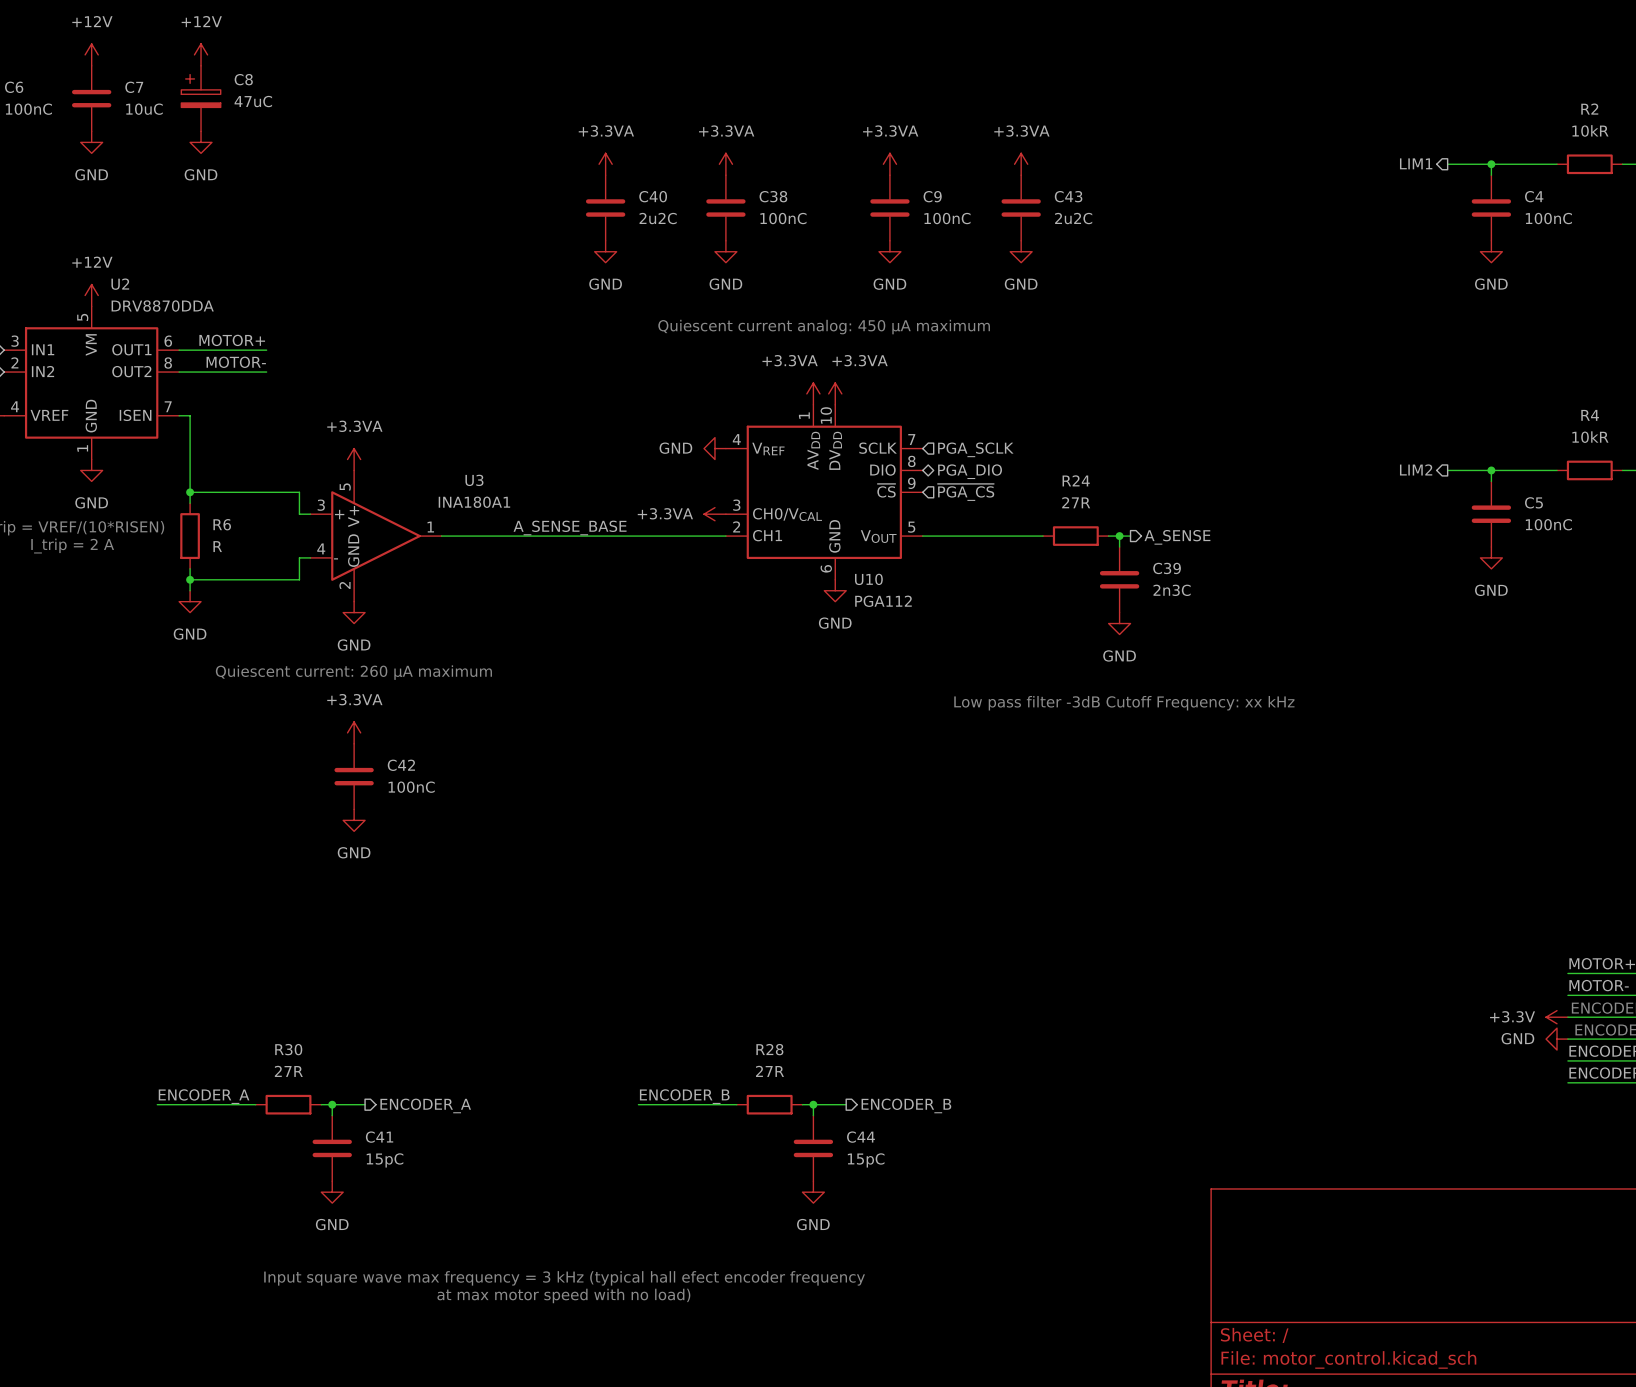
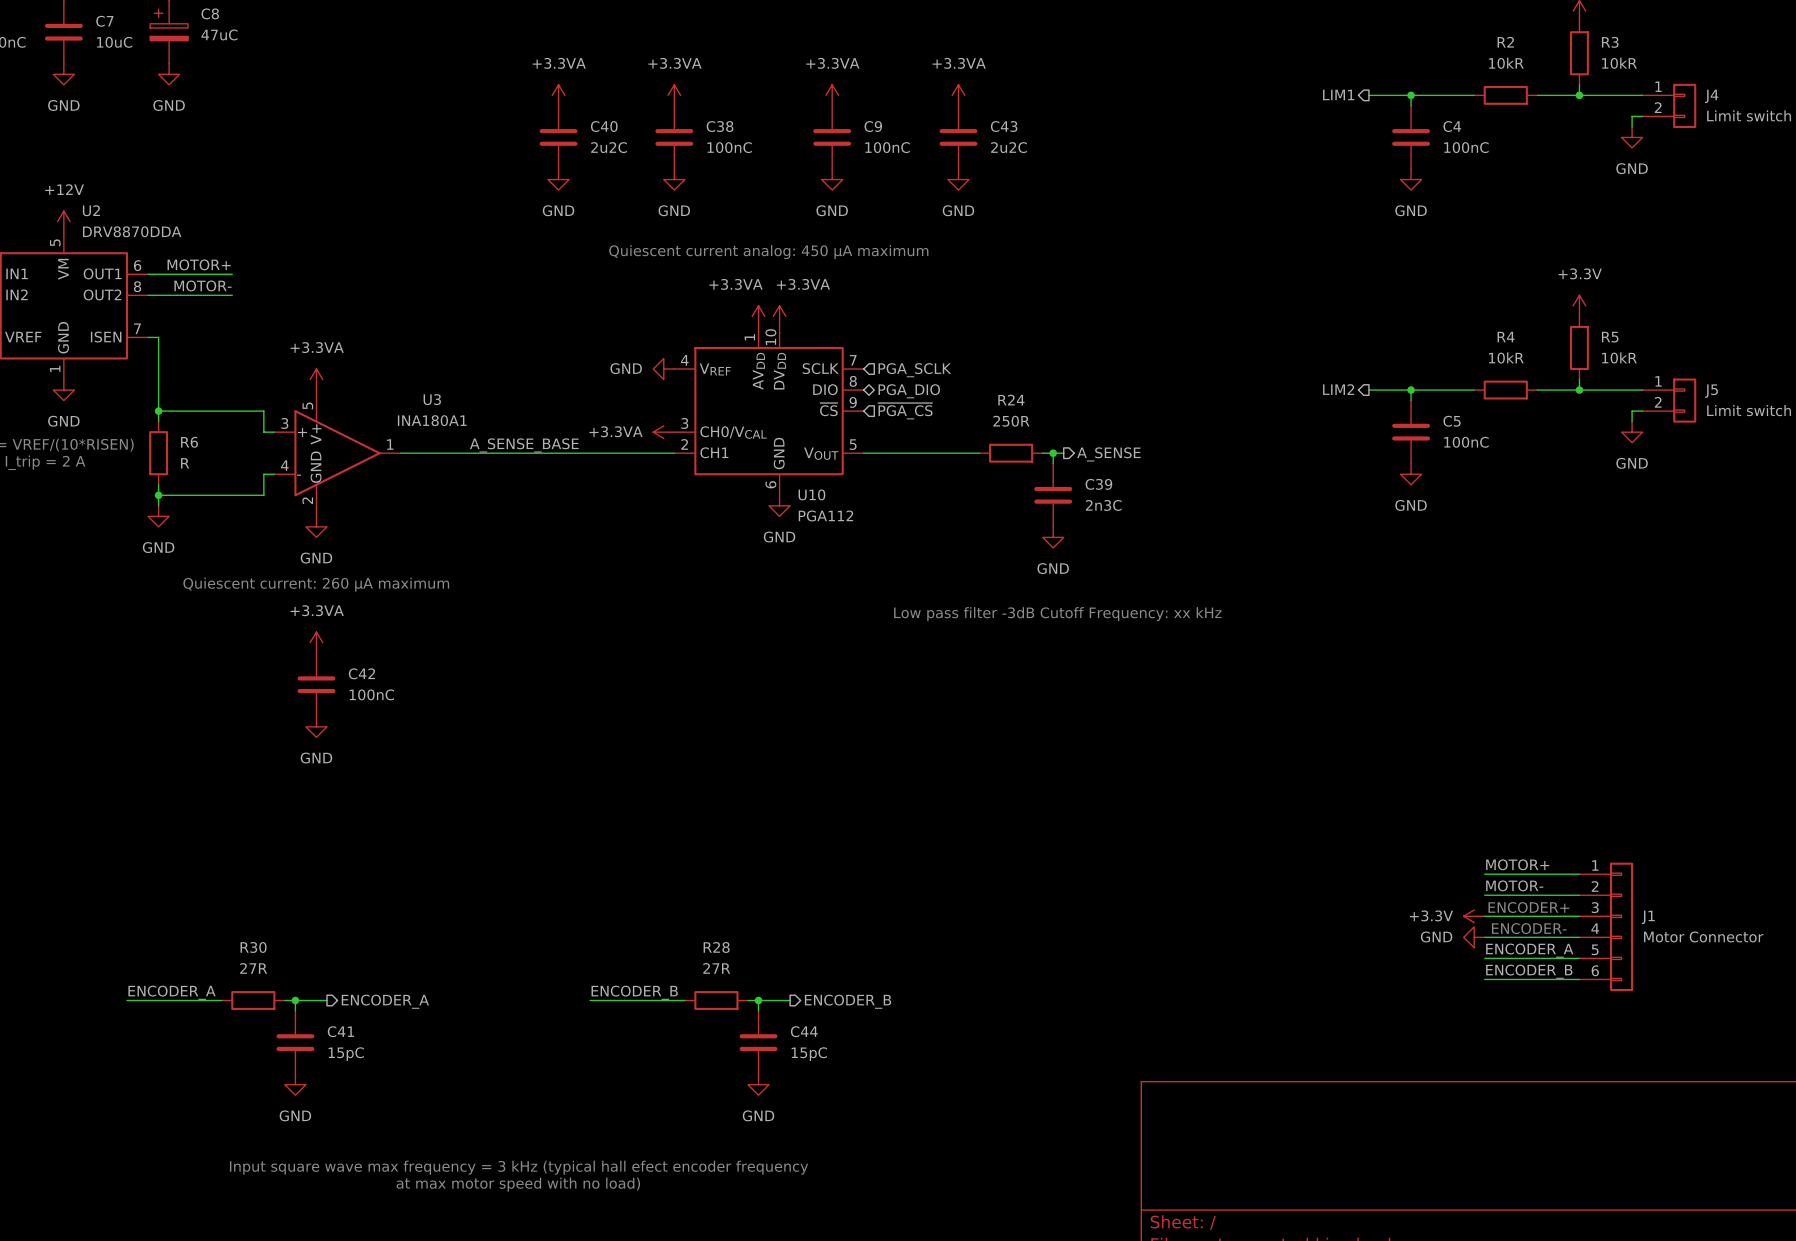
R24 value: 27R (1076, 502) -> 250R (1011, 421)

